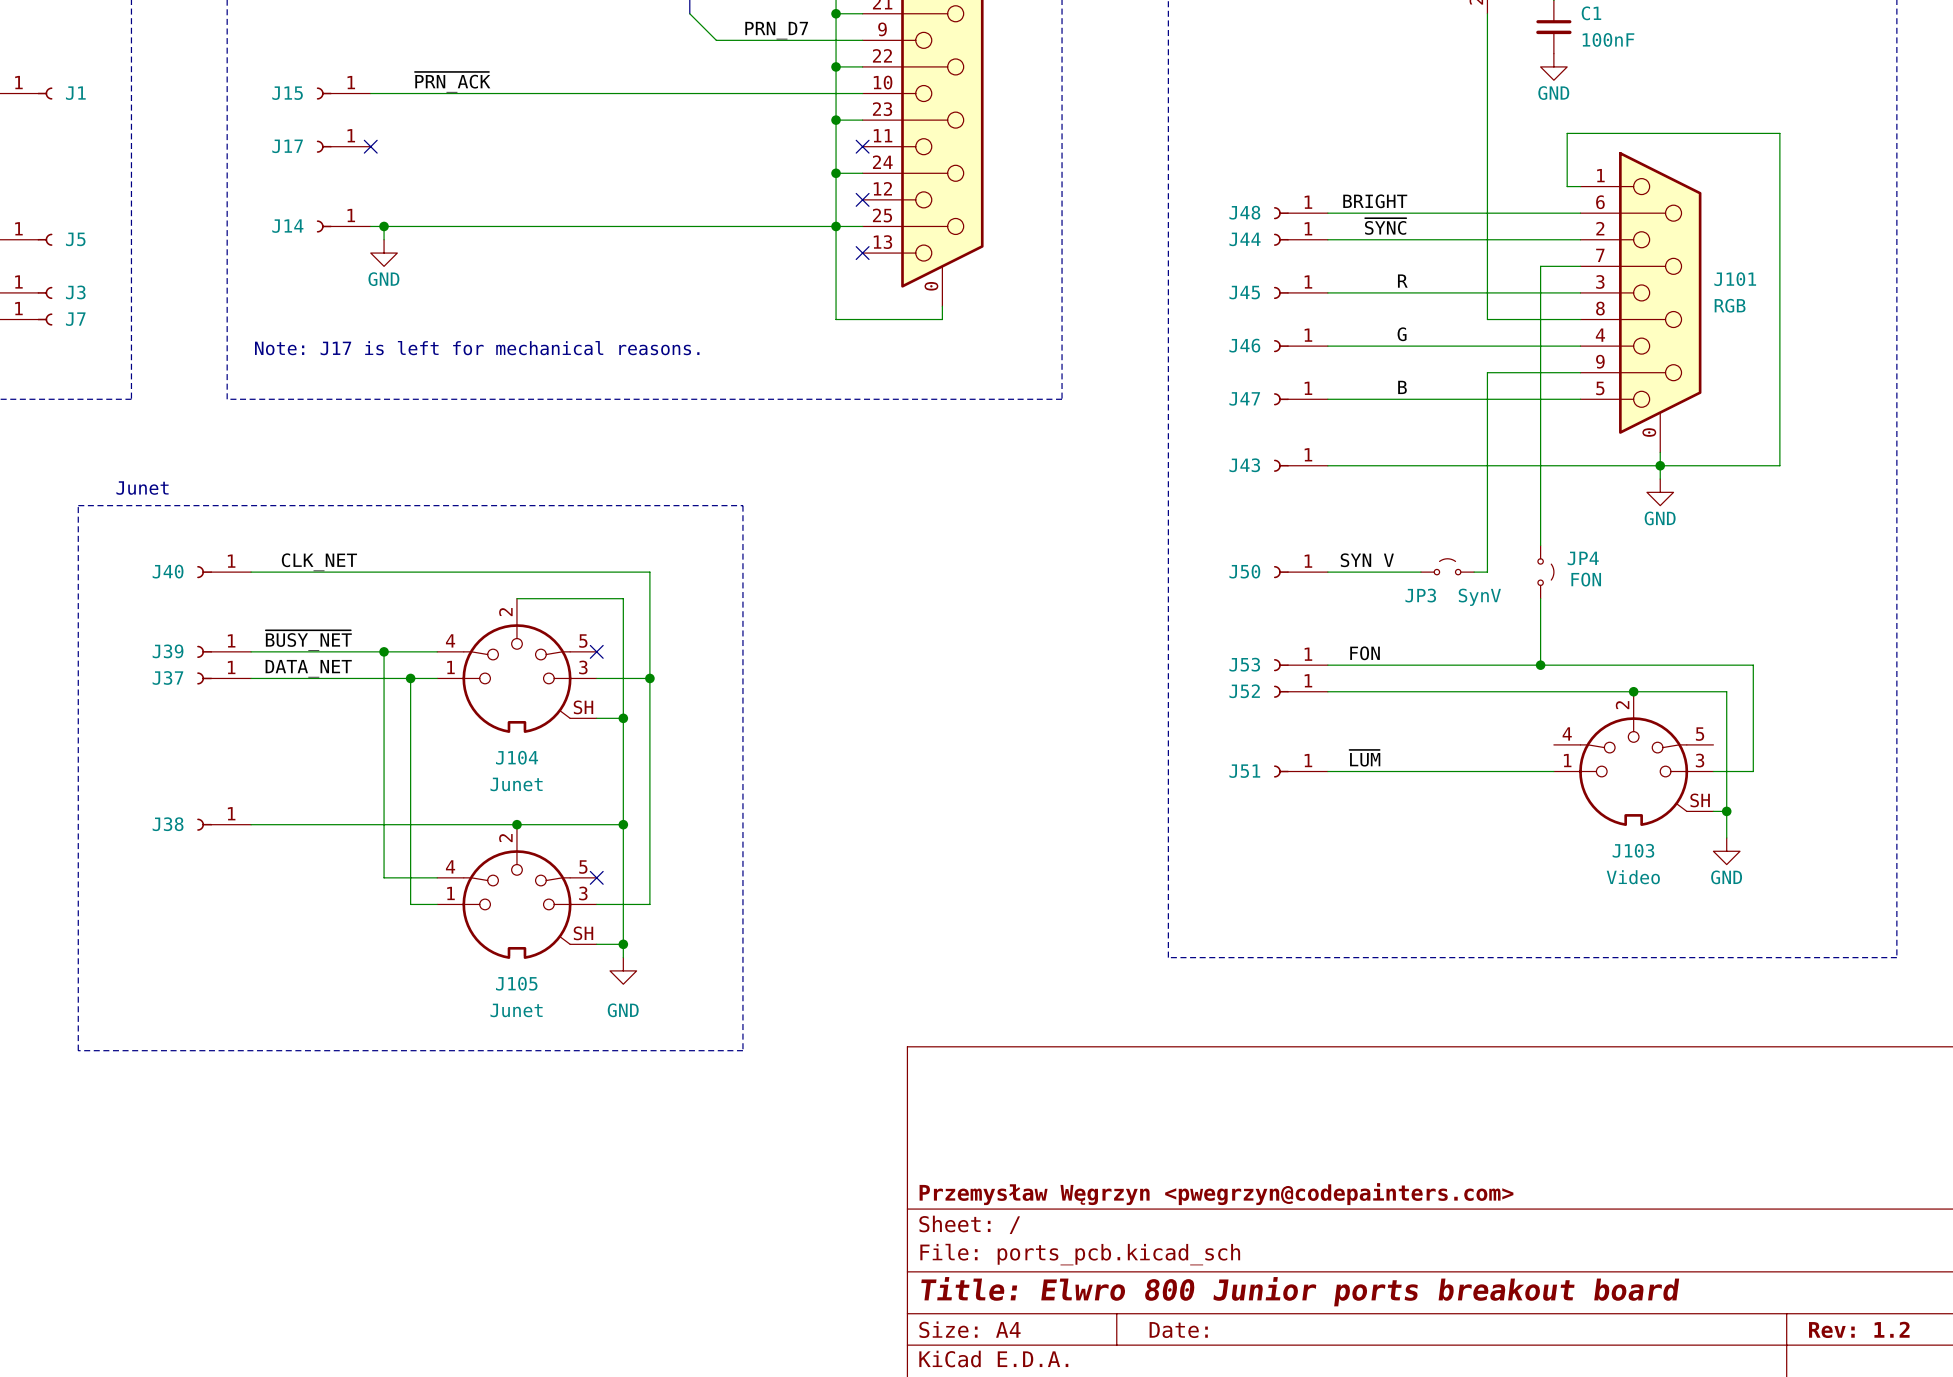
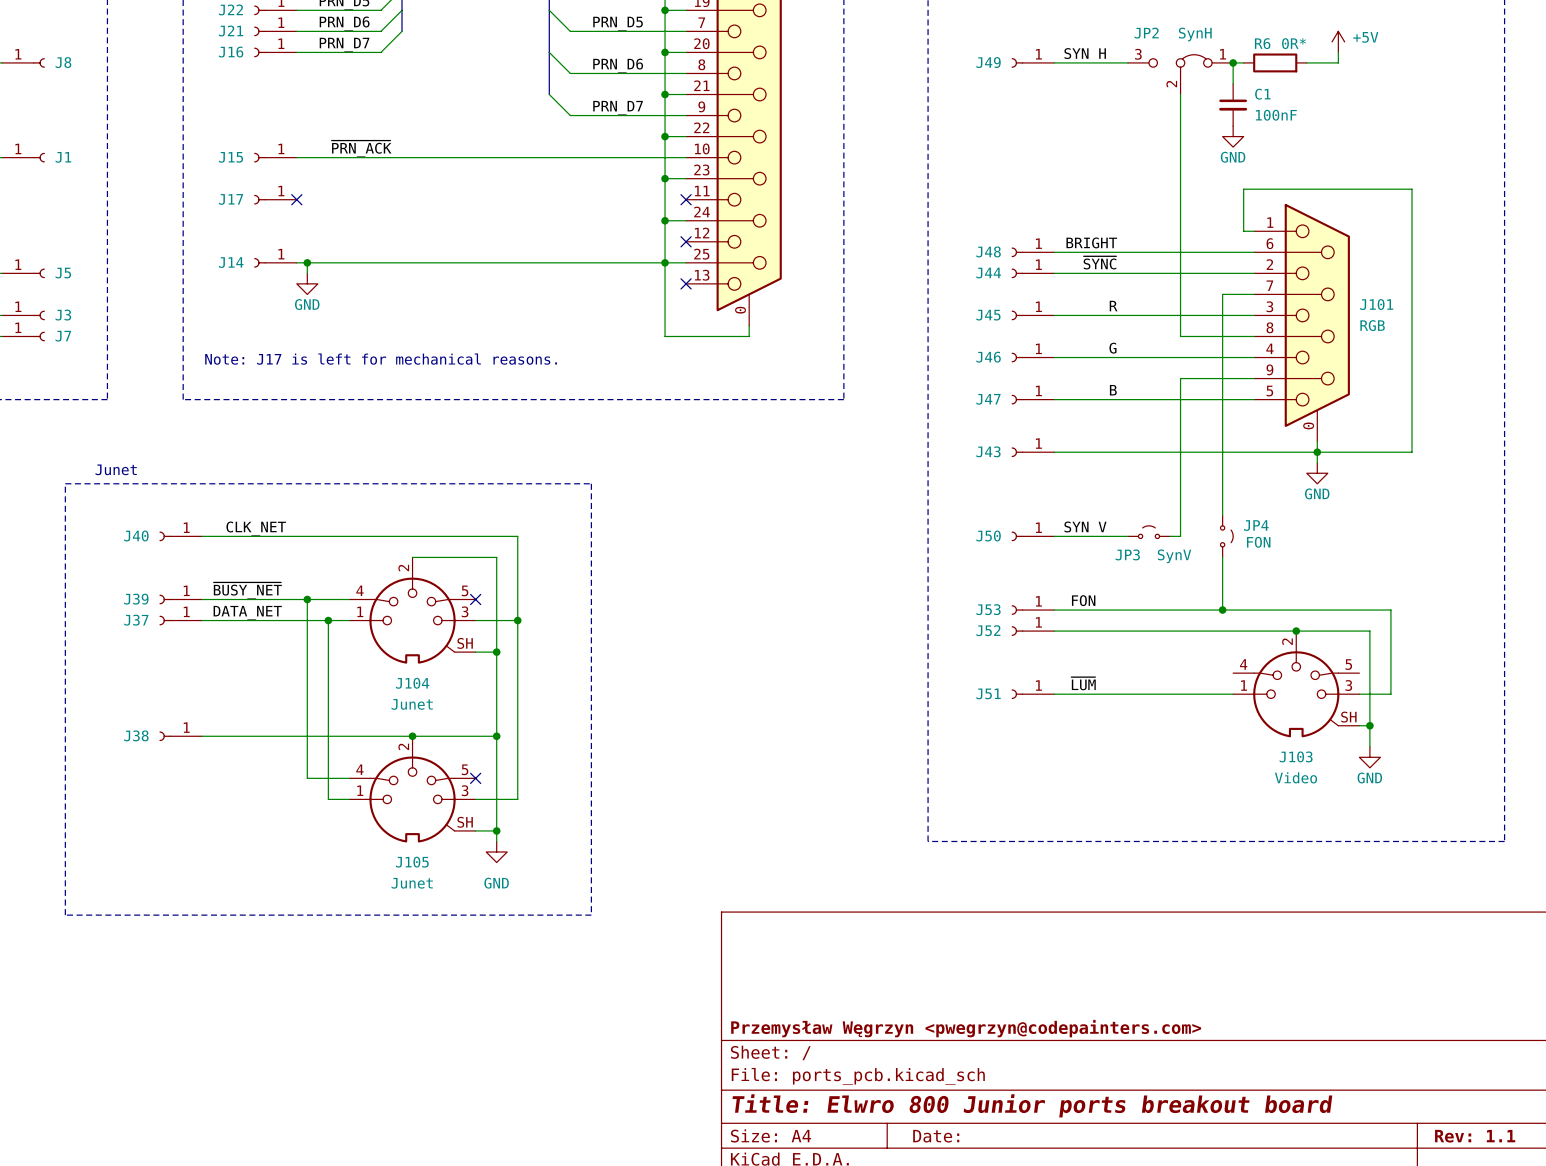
title block: Rev: 1.2 (1859, 1329) -> Rev: 1.1 (1475, 1136)

